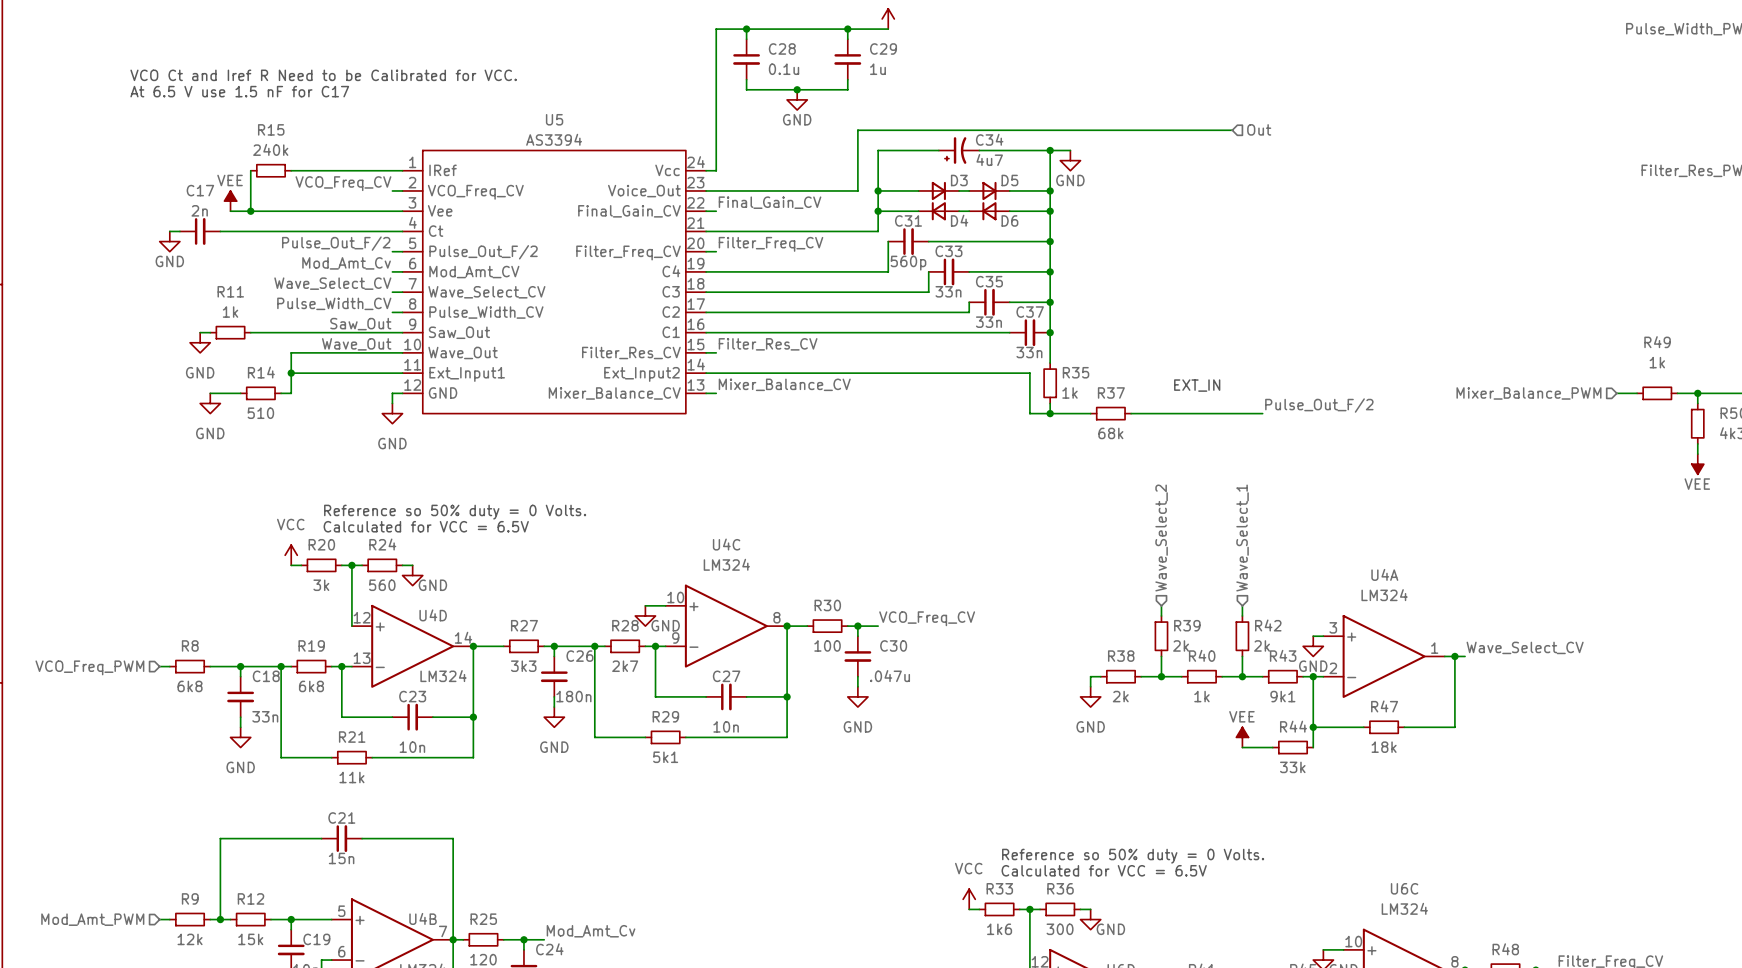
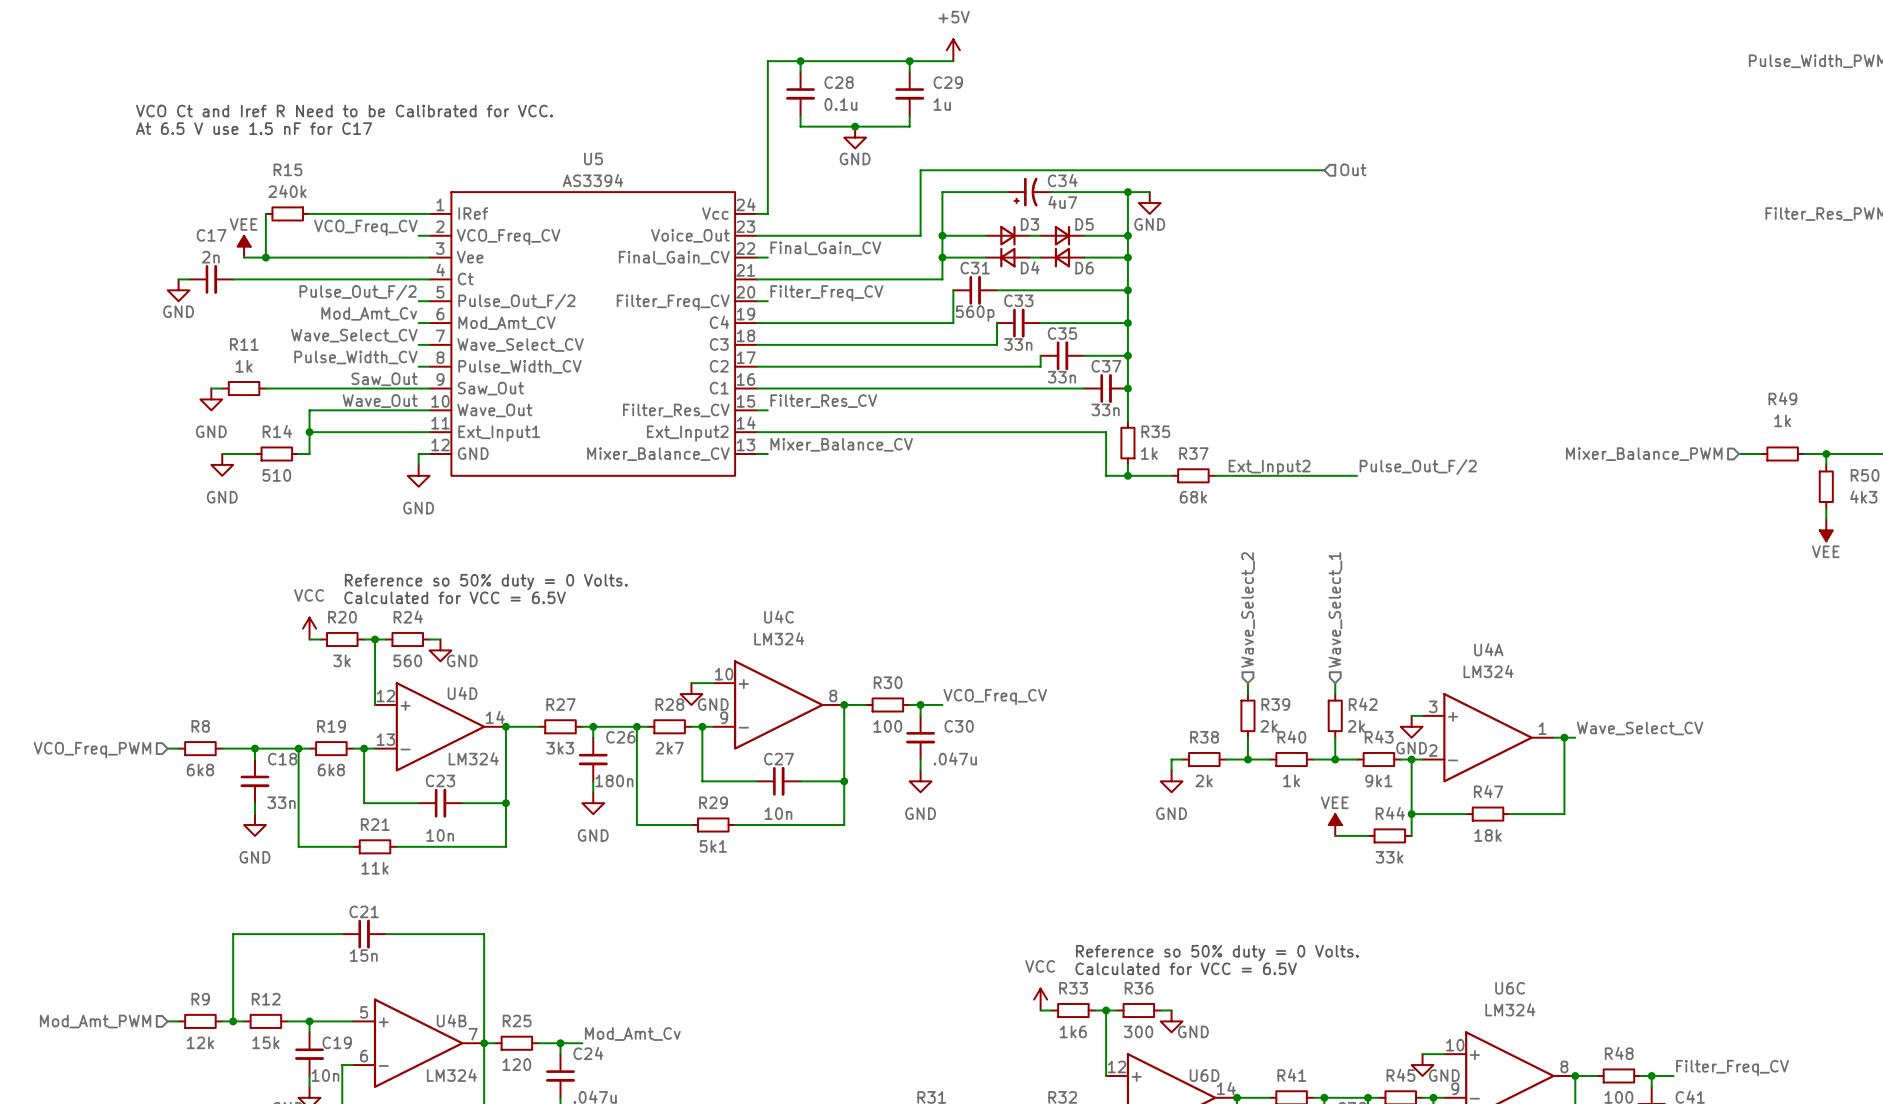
text: EXT_IN (1197, 385) -> none
label: none -> Ext_Input2 (1269, 467)

